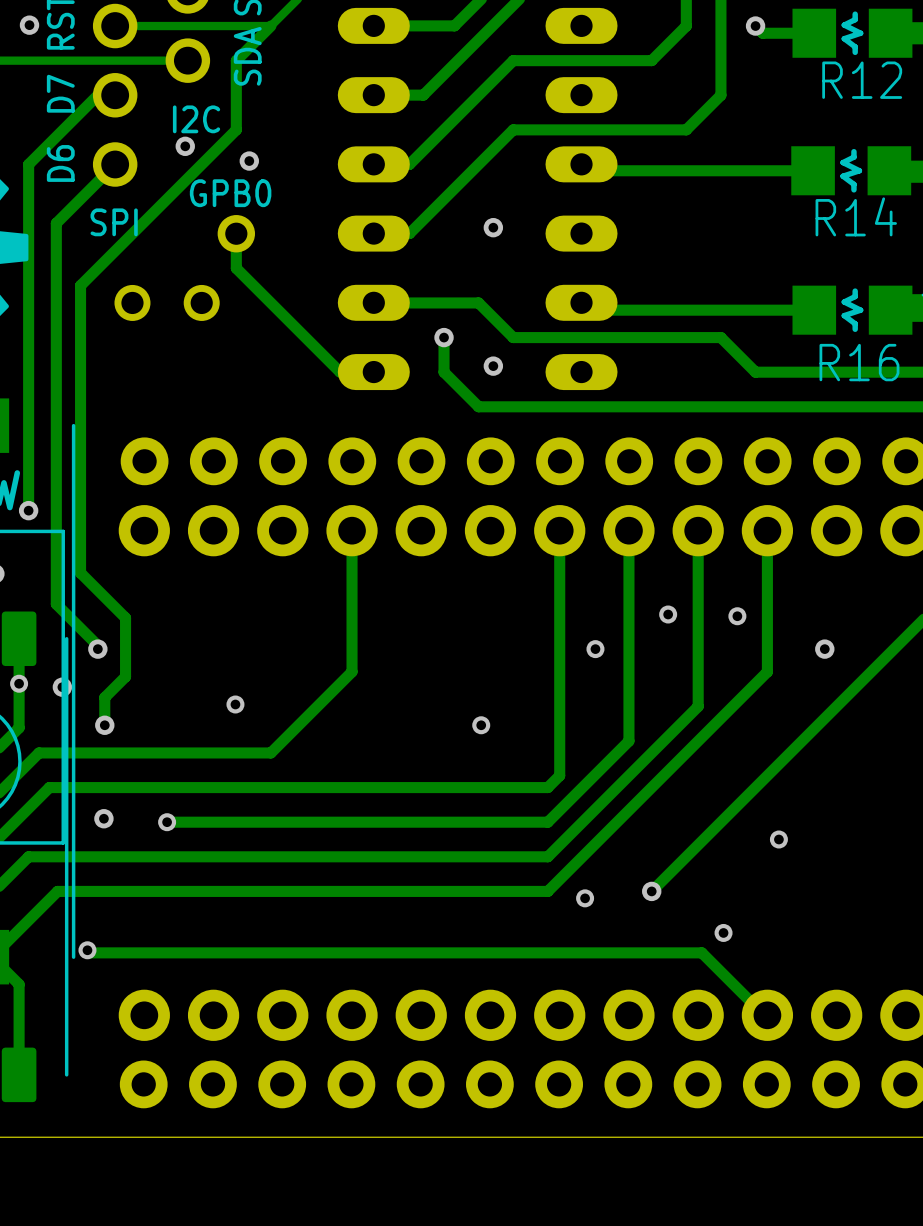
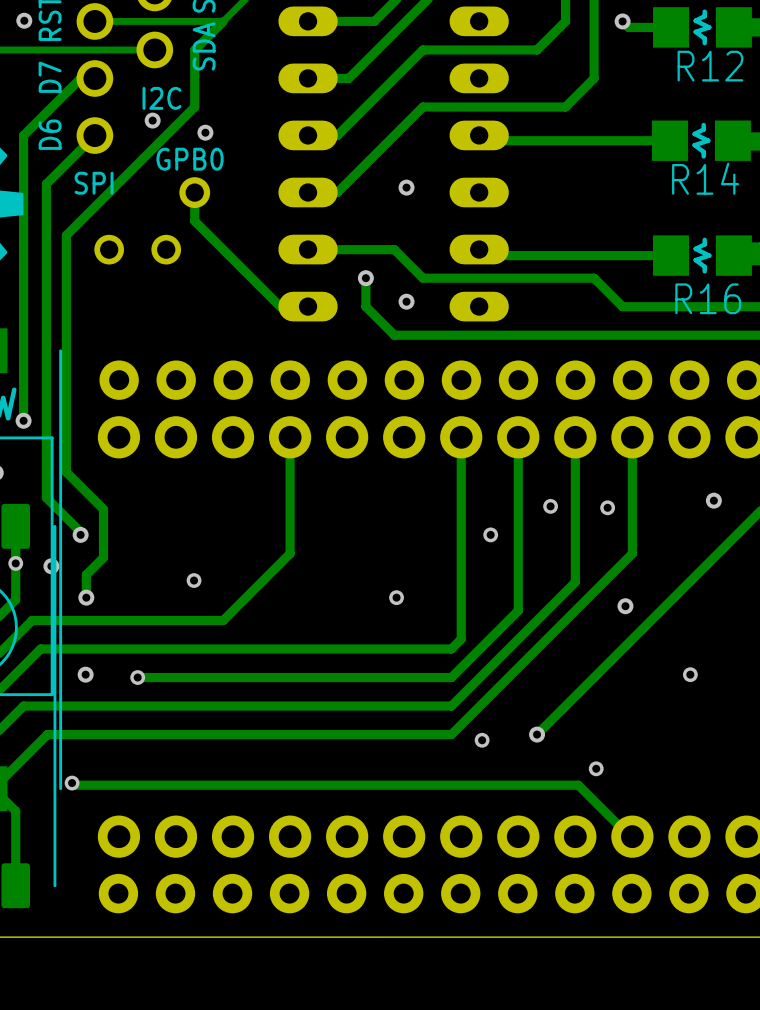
via: none -> (713, 500)
via: (824, 649) -> none
via: none -> (625, 606)
via position: (778, 839) -> (690, 674)

